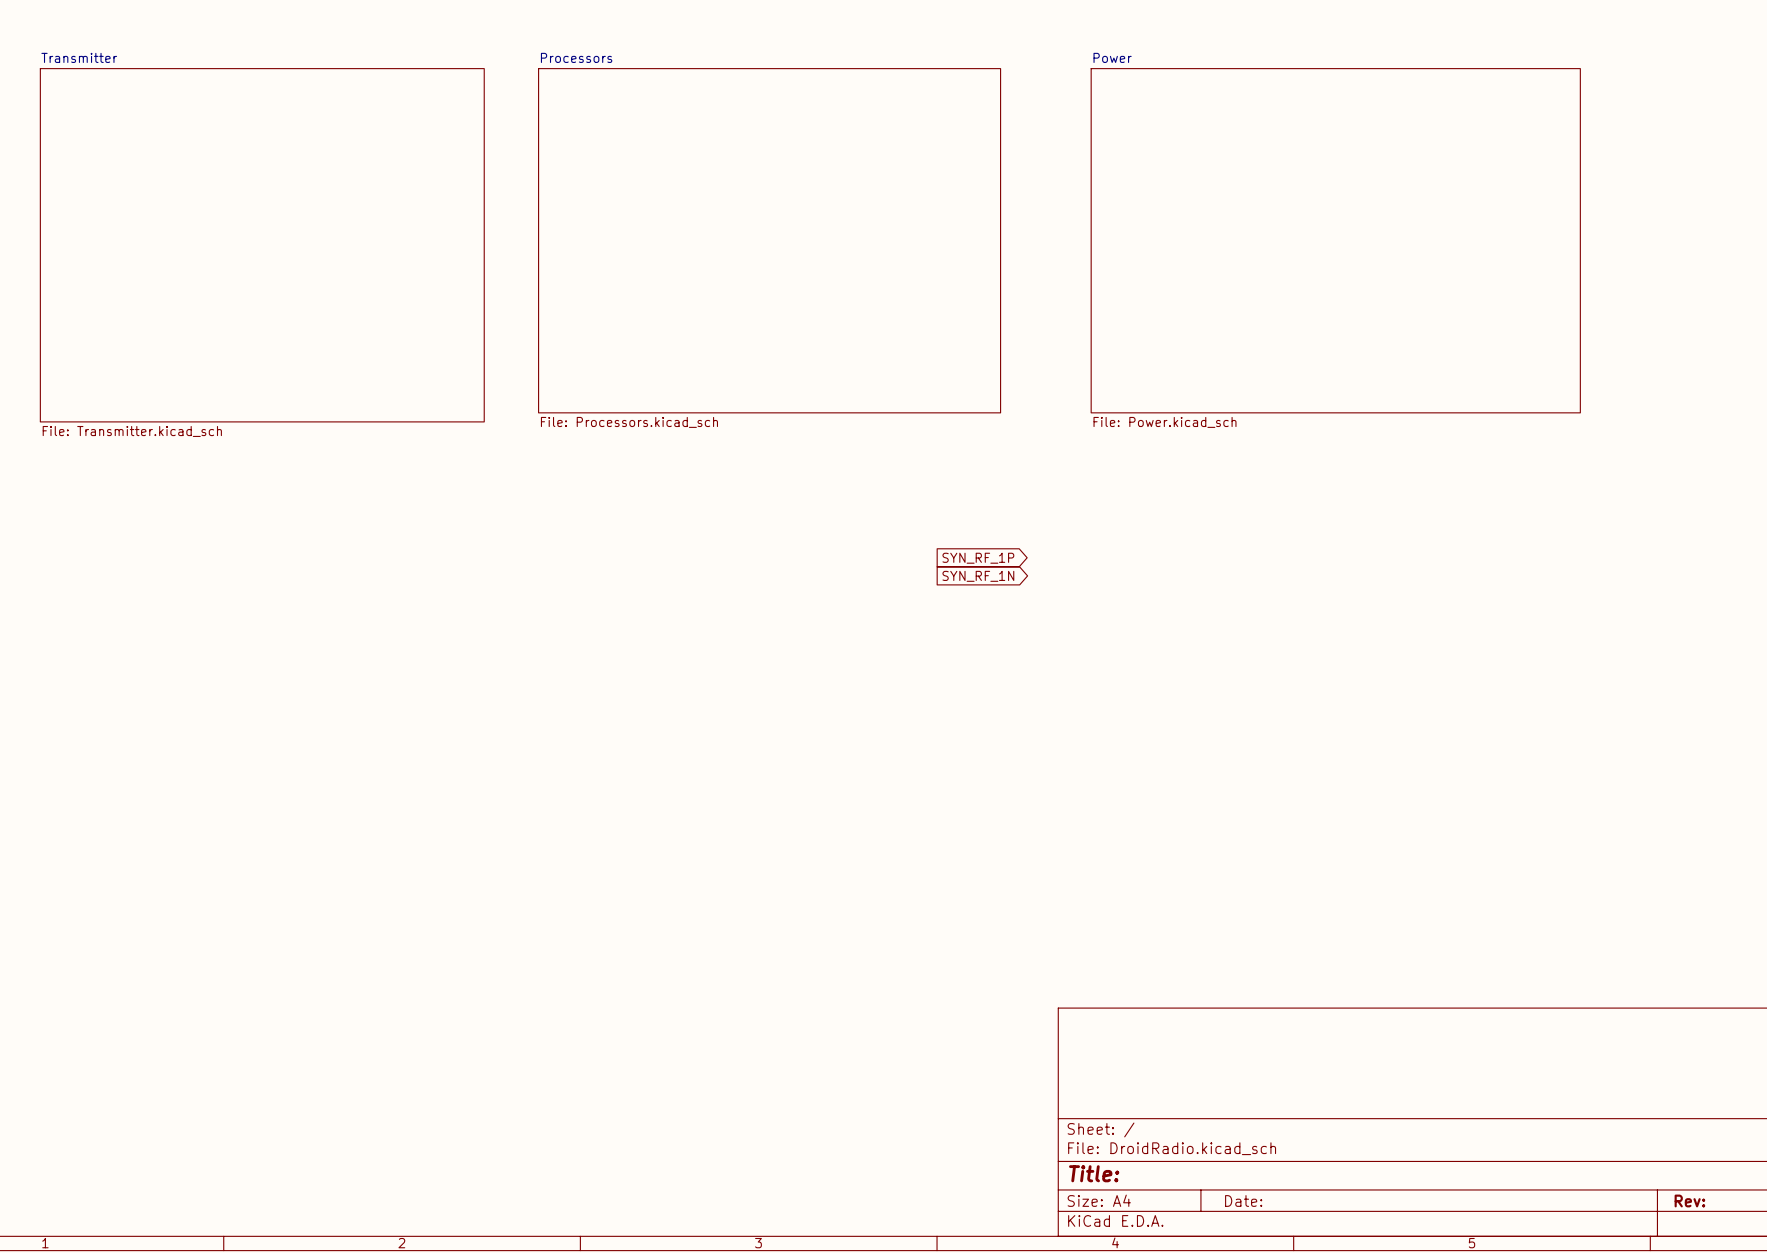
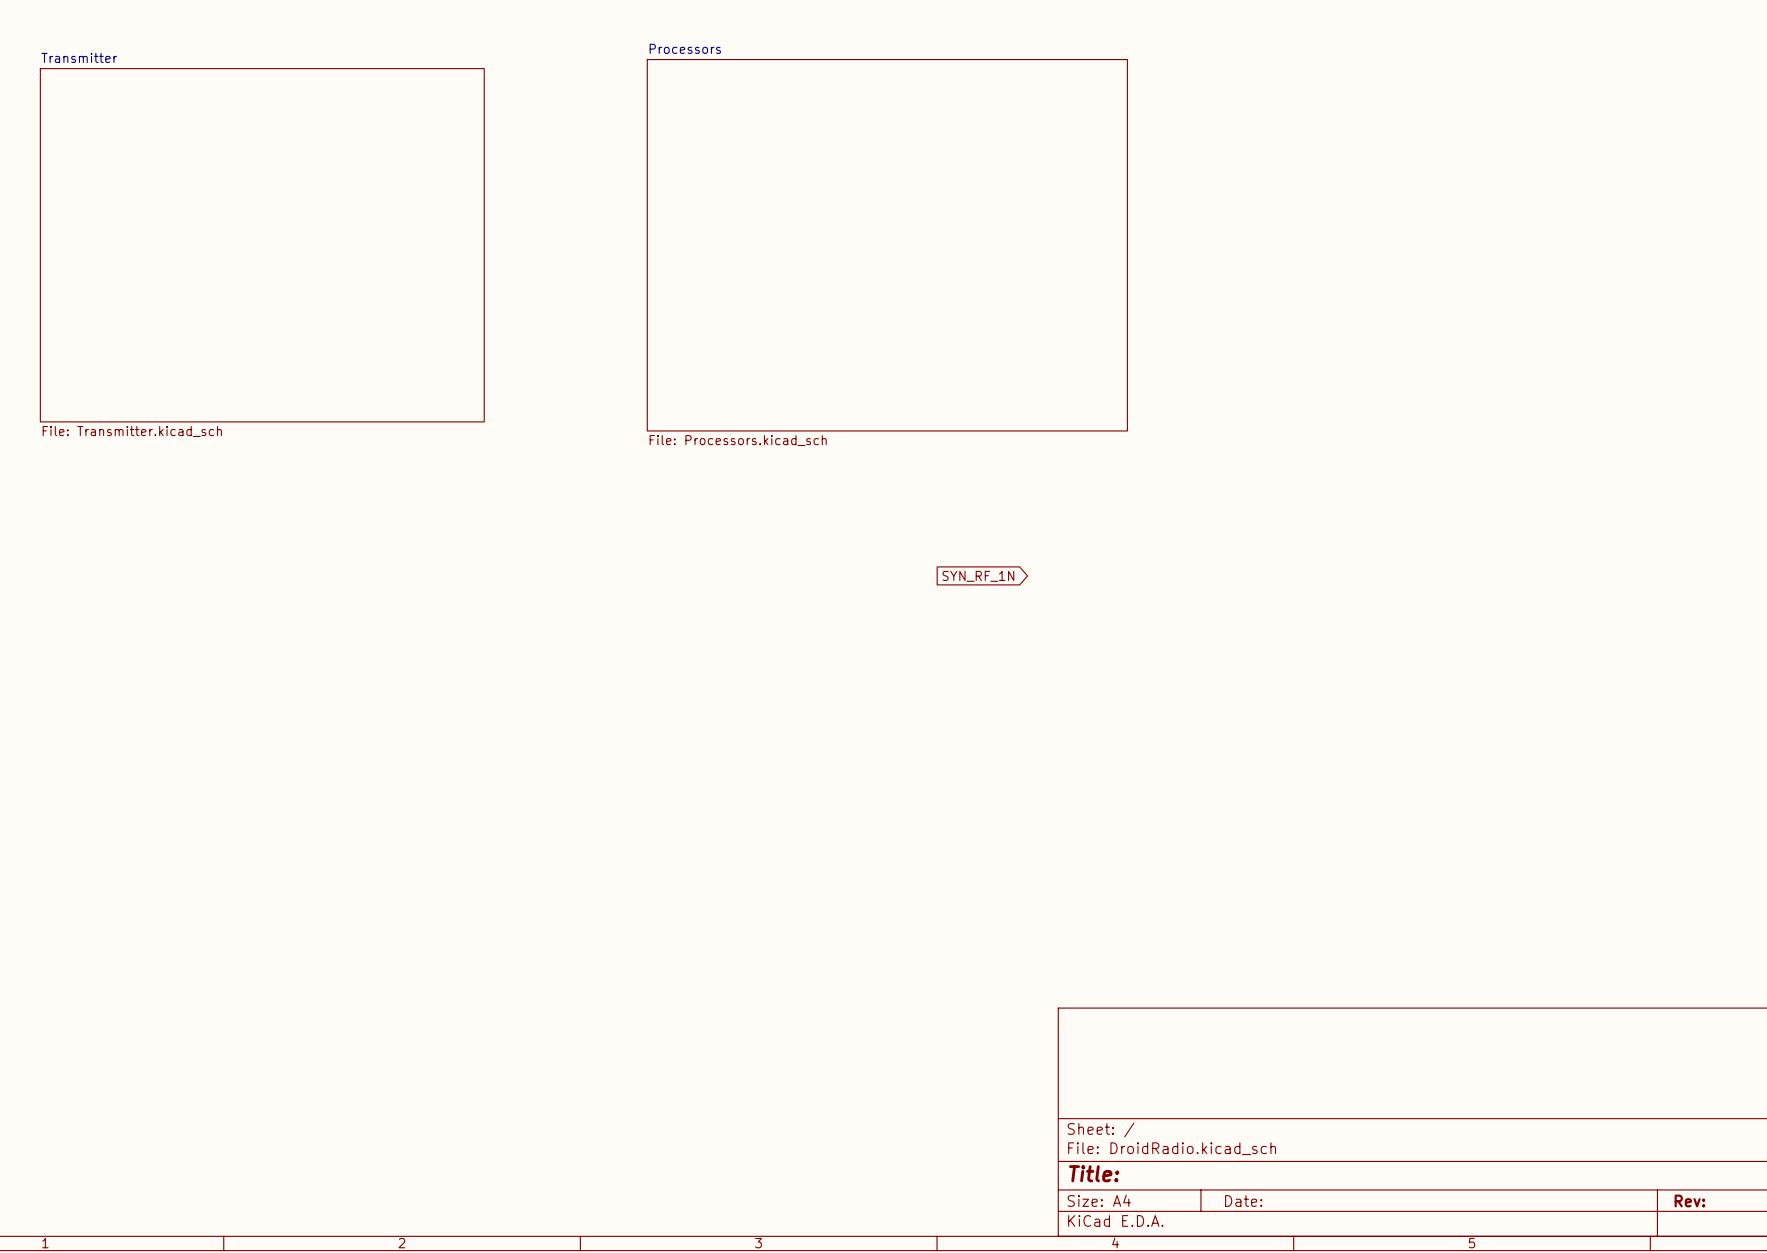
sheet Processors: File: Processors.kicad_sch (769, 240) -> none
sheet Power: File: Power.kicad_sch (1335, 240) -> none
sheet Processors: none -> File: Processors.kicad_sch (887, 245)
global label: SYN_RF_1P (978, 558) -> none

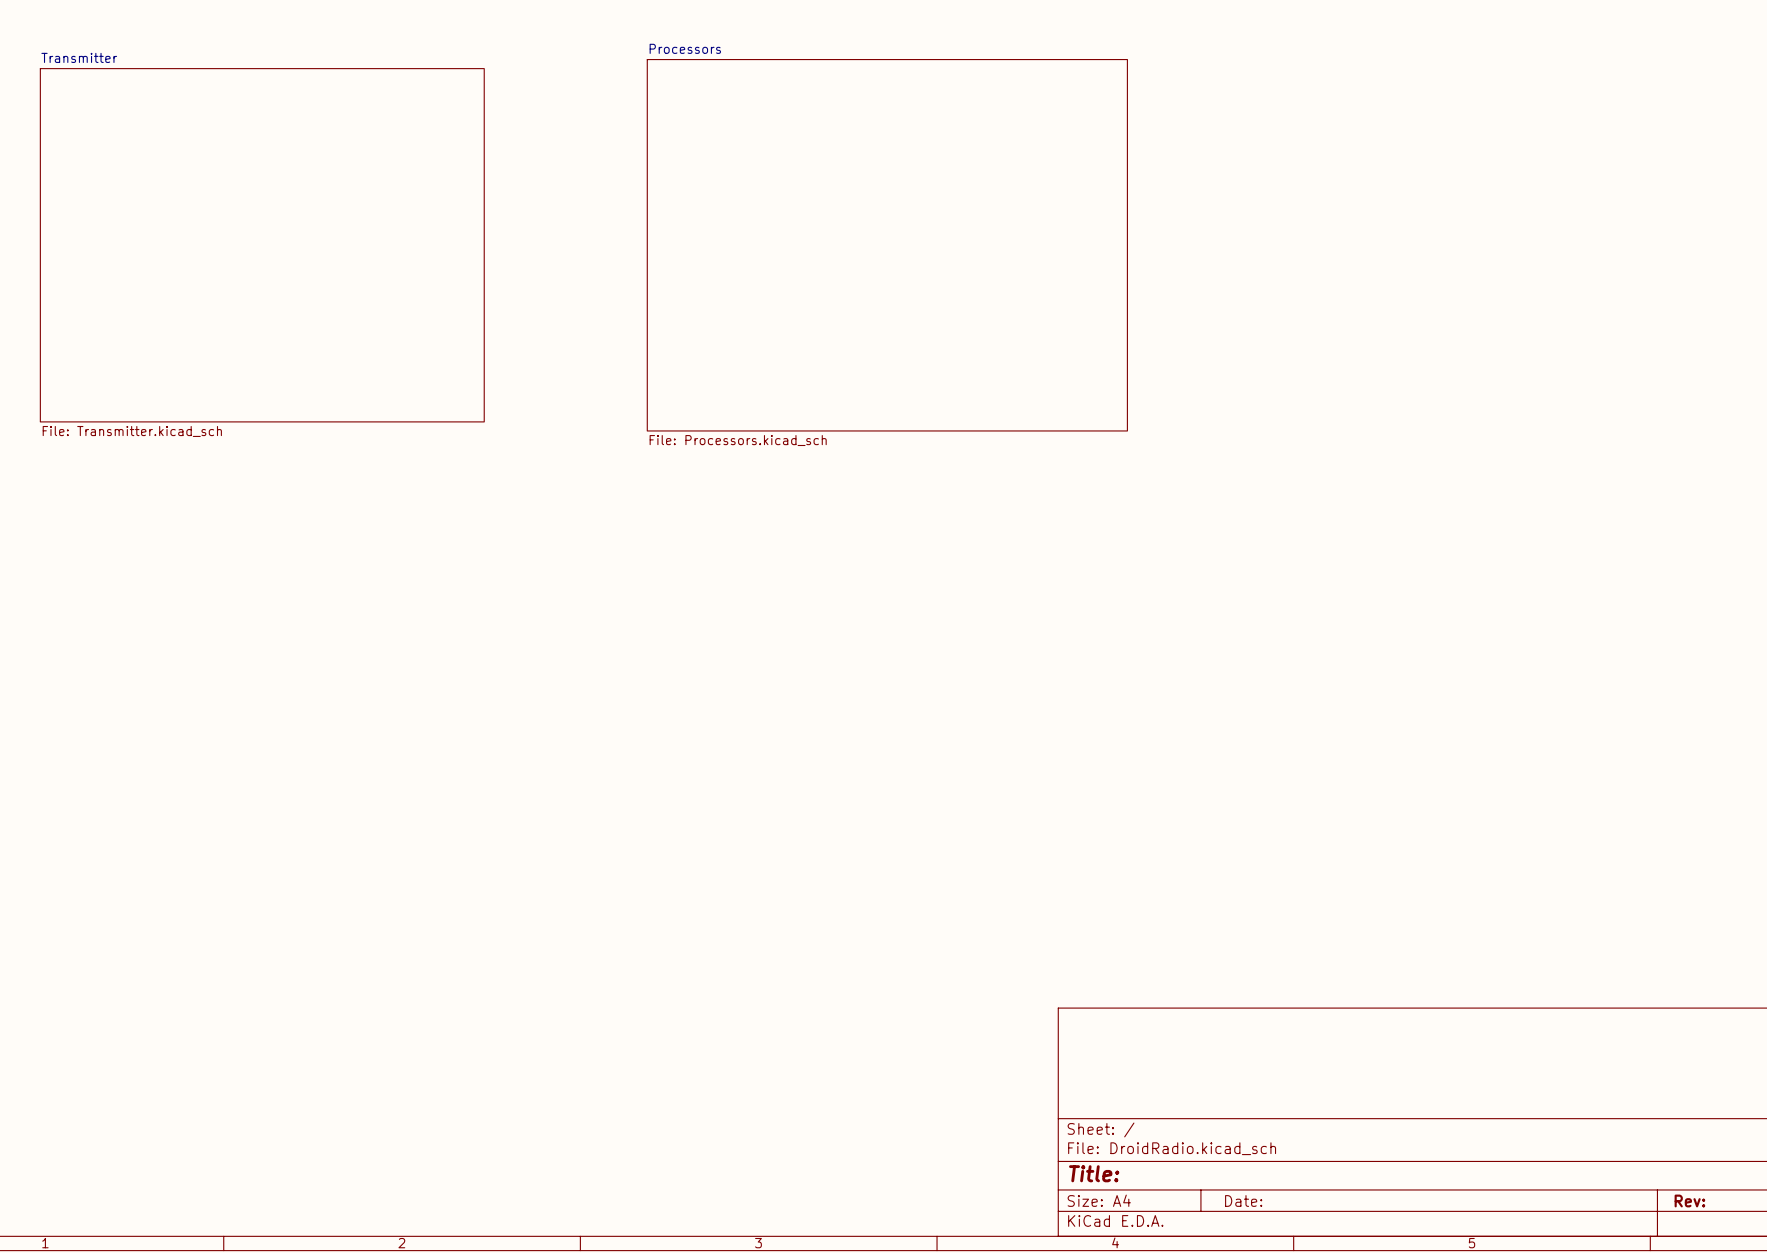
global label: SYN_RF_1N (978, 576) -> none

